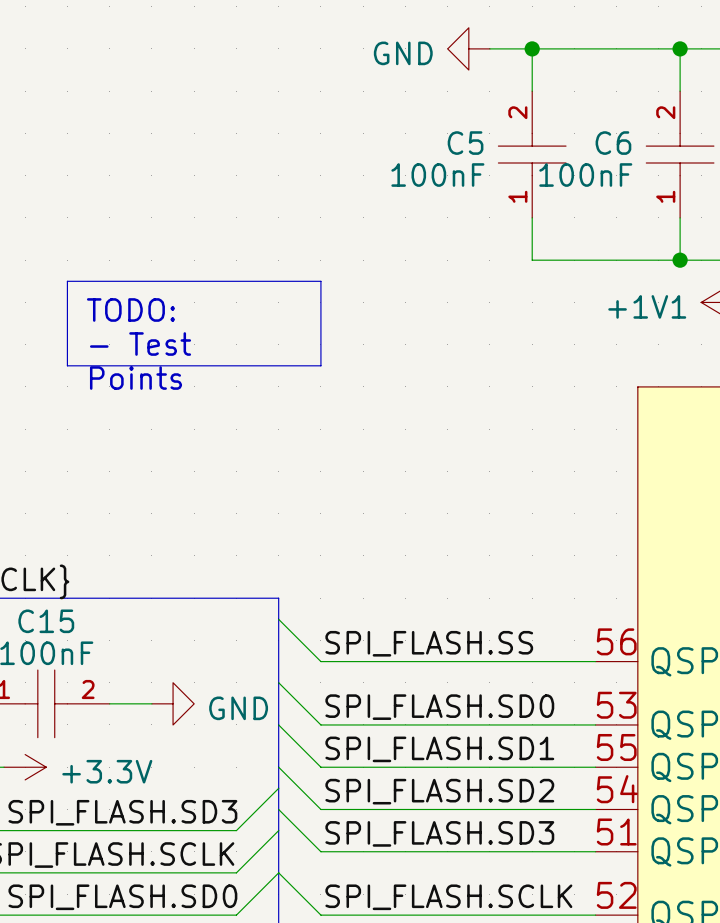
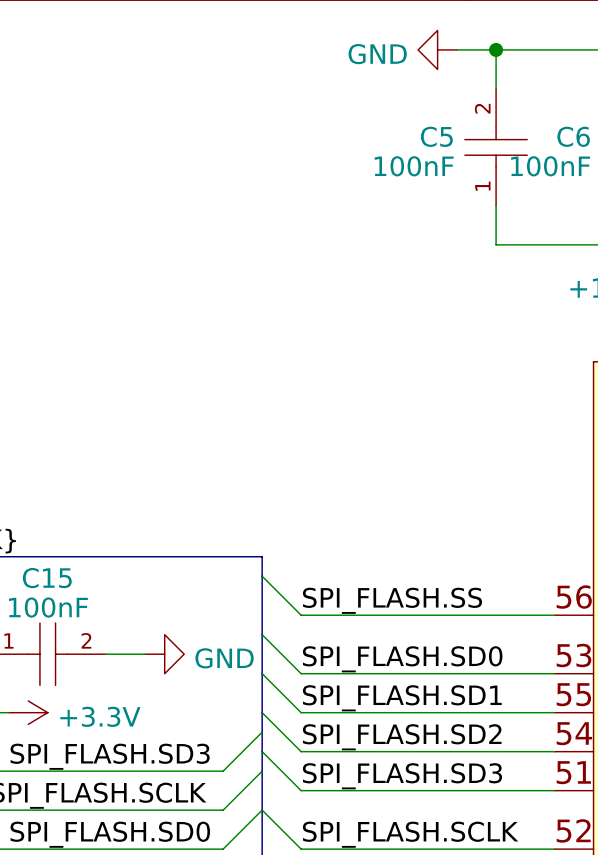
line: (67, 281) (320, 281) (320, 365) (67, 365) (67, 281) -> none
text: TODO: (130, 309) -> none
text: - Test (140, 344) -> none
text: Points (135, 378) -> none

